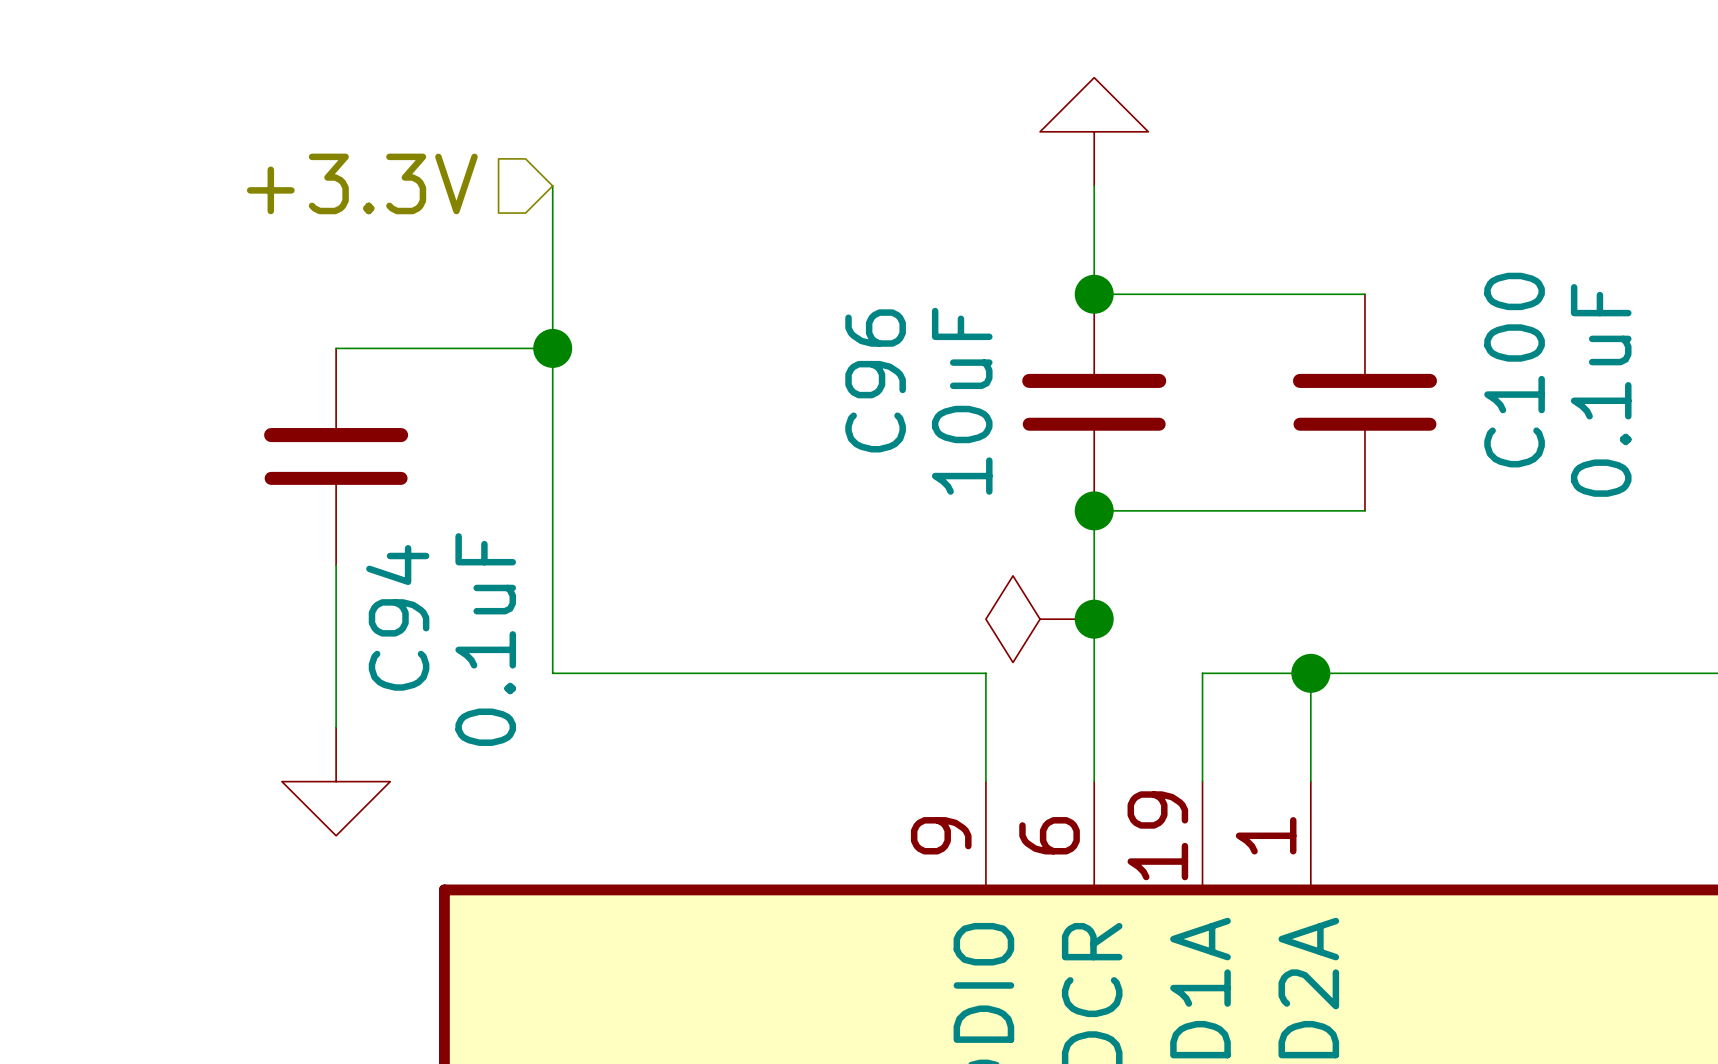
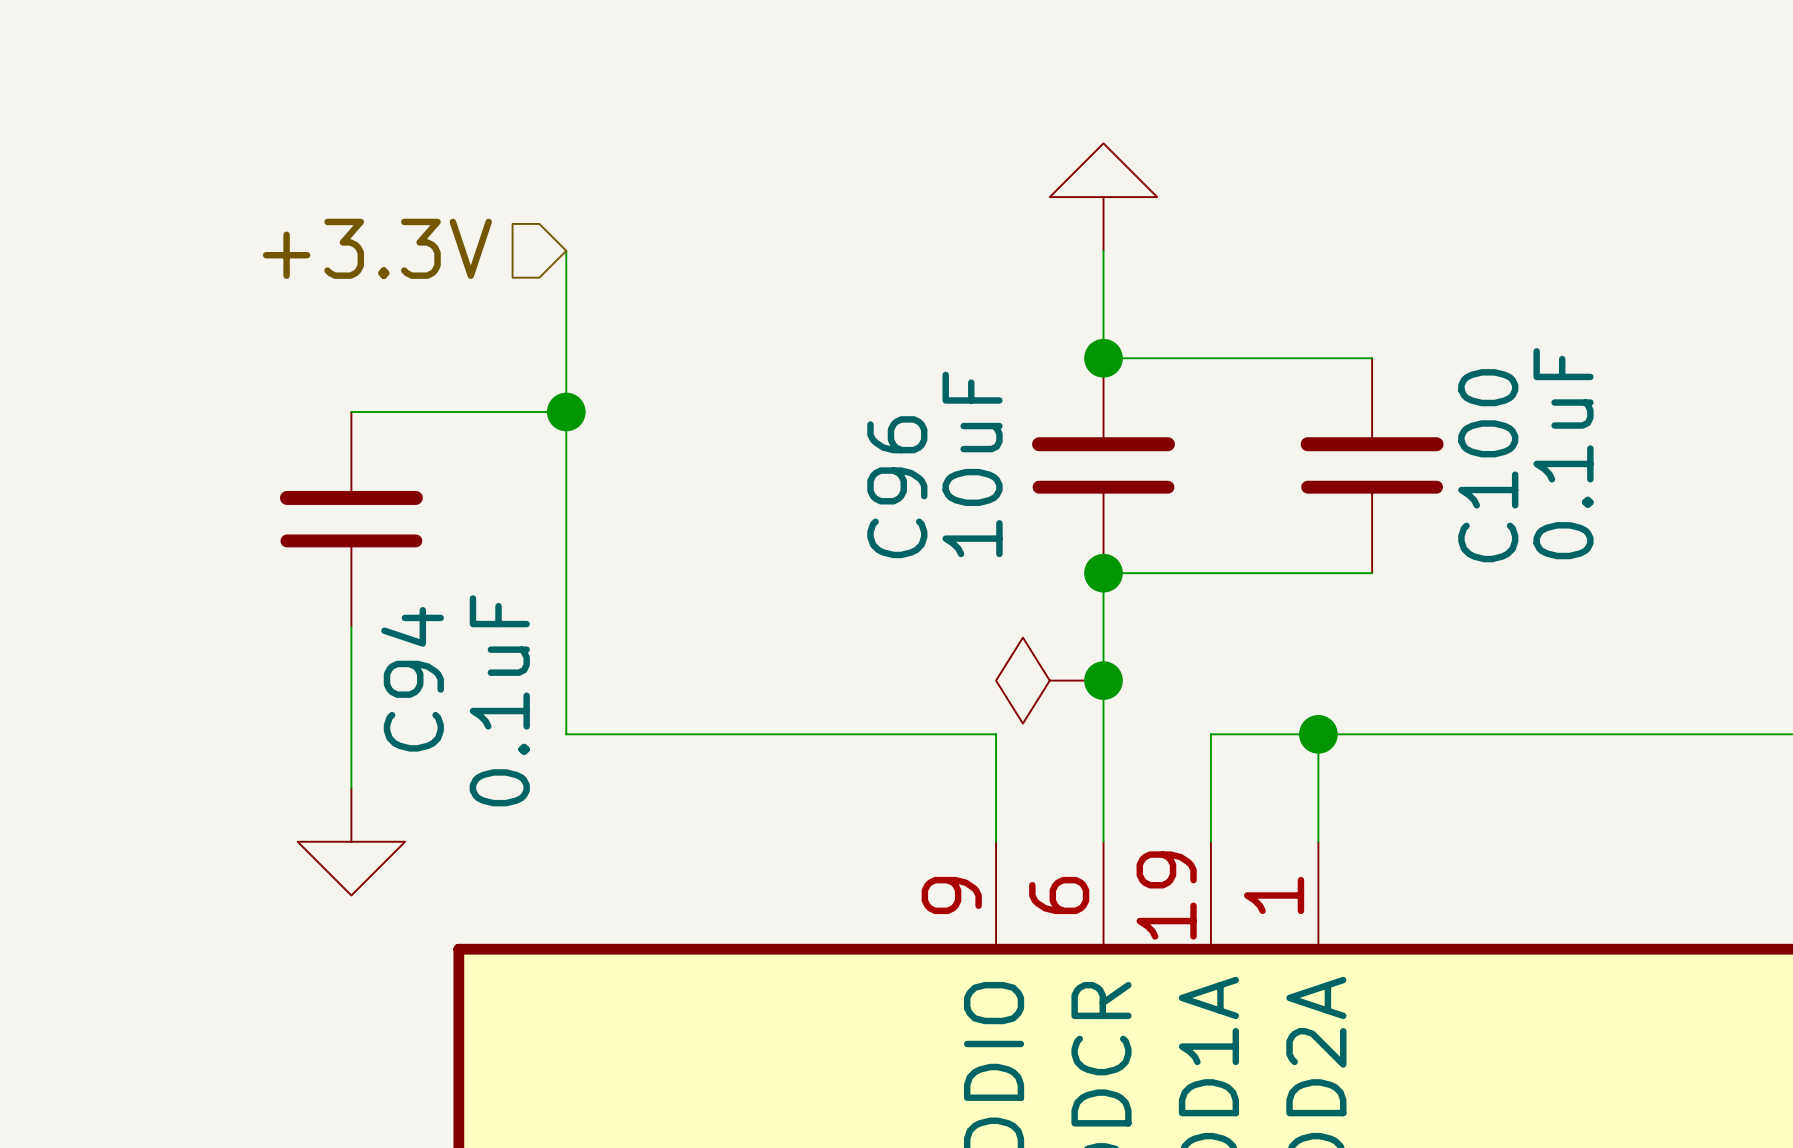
C100 name position: C100 (1514, 370) -> C100 (1488, 465)
C96 name position: C96 (875, 380) -> C96 (897, 487)
C100 value position: 0.1uF (1601, 390) -> 0.1uF (1563, 453)

